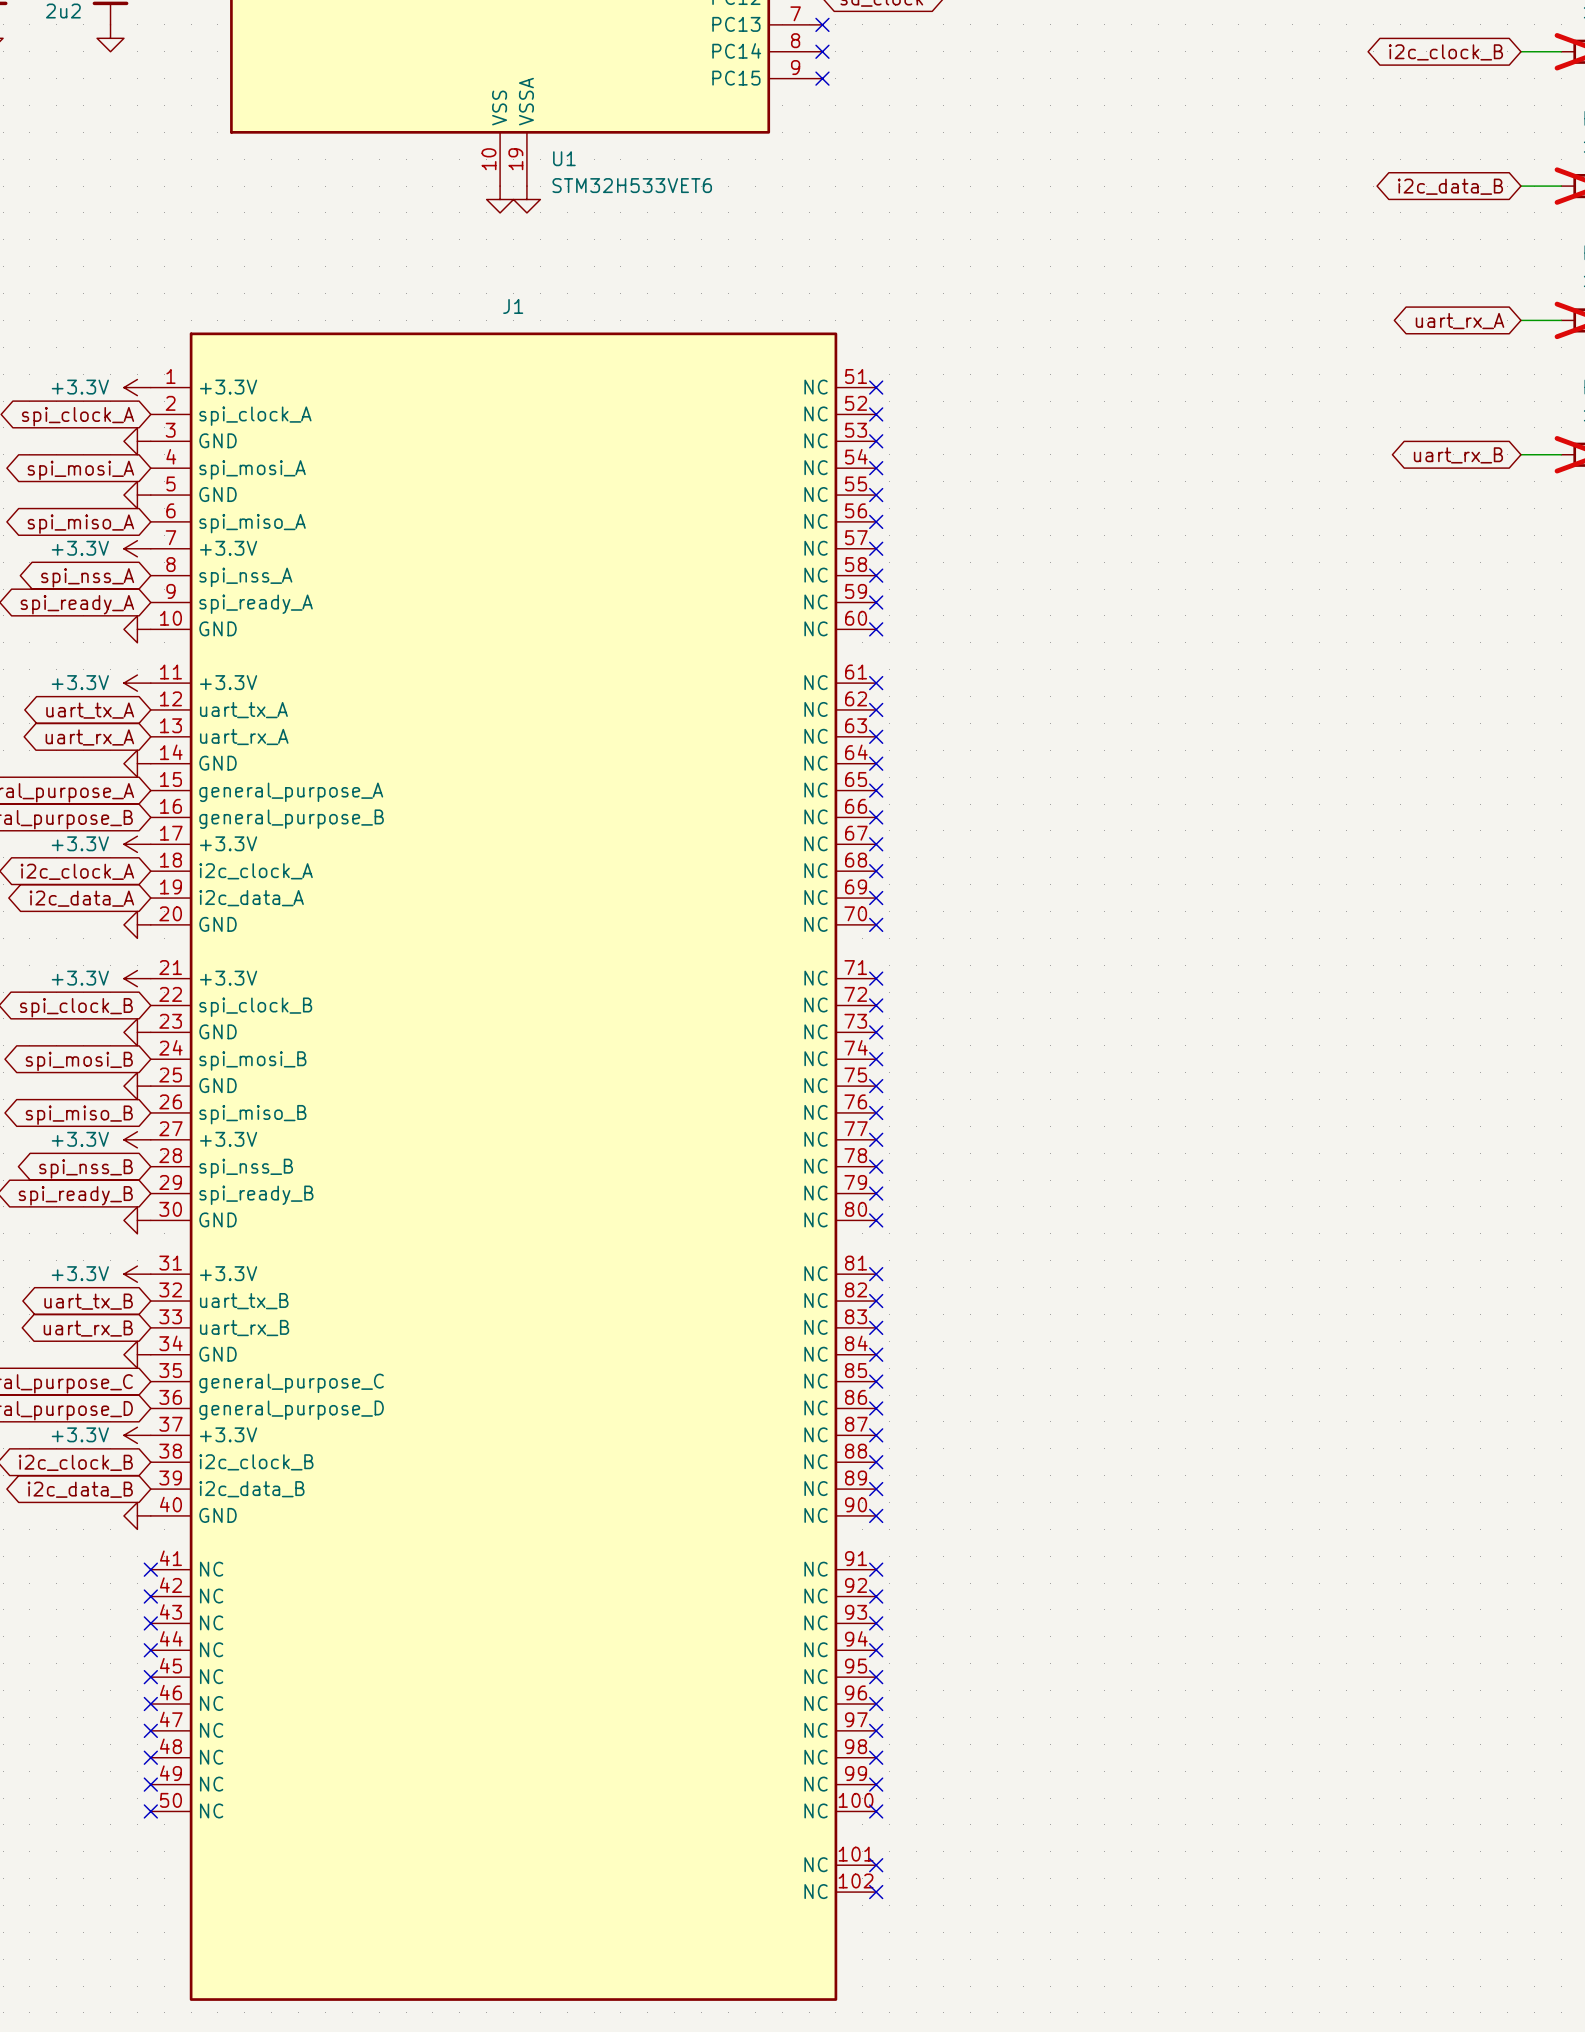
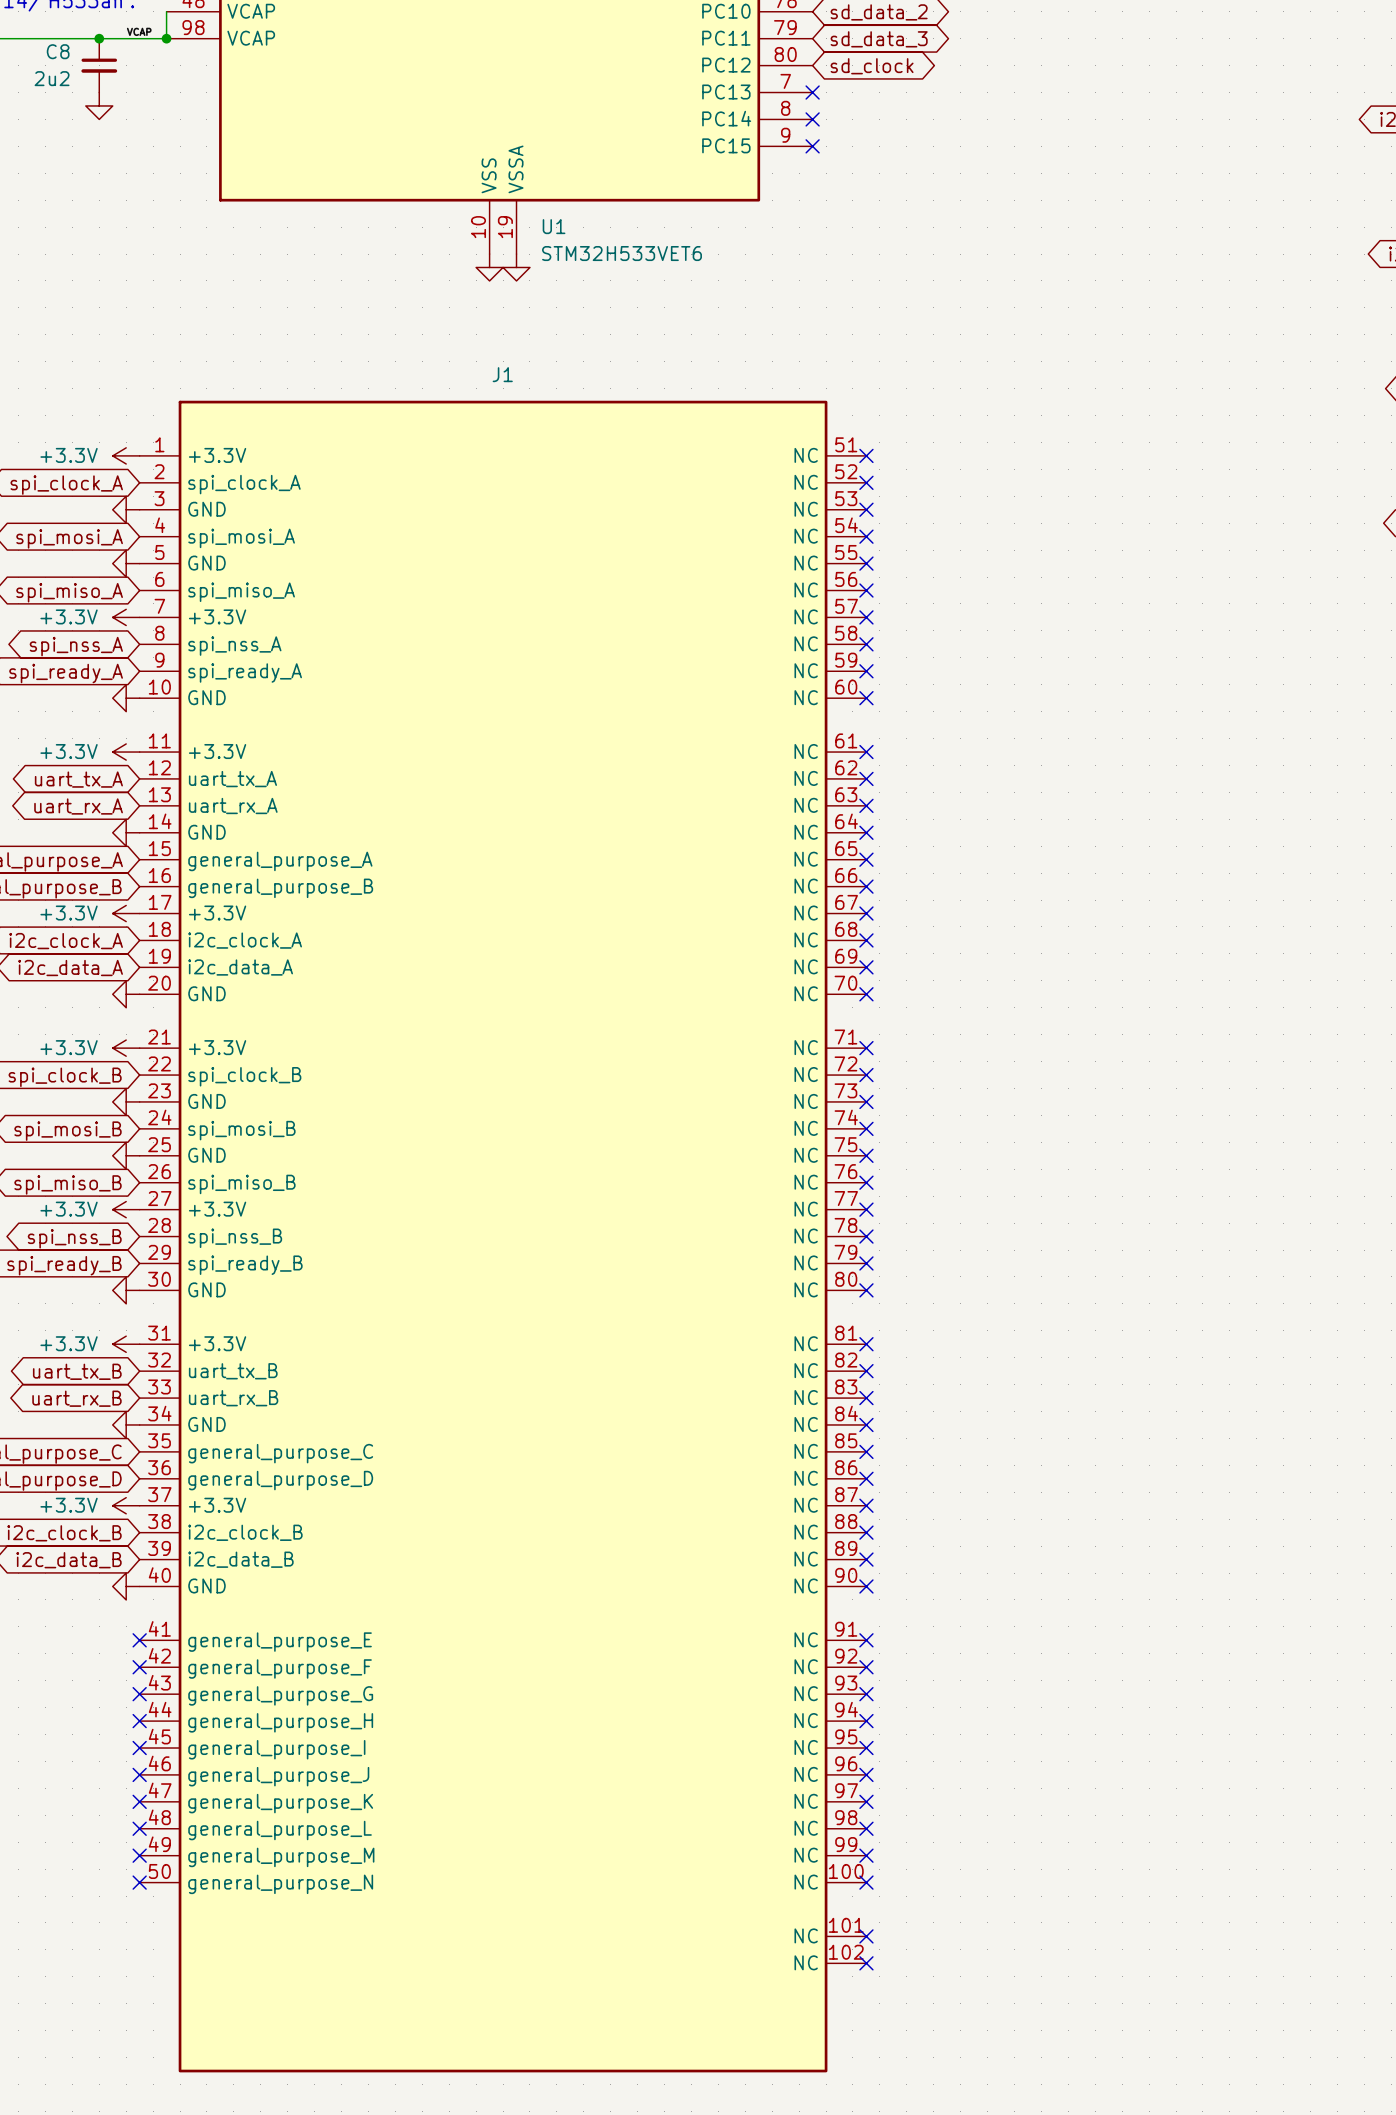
J1 symbol: [150, 332, 877, 2001] -> [139, 400, 867, 2073]

